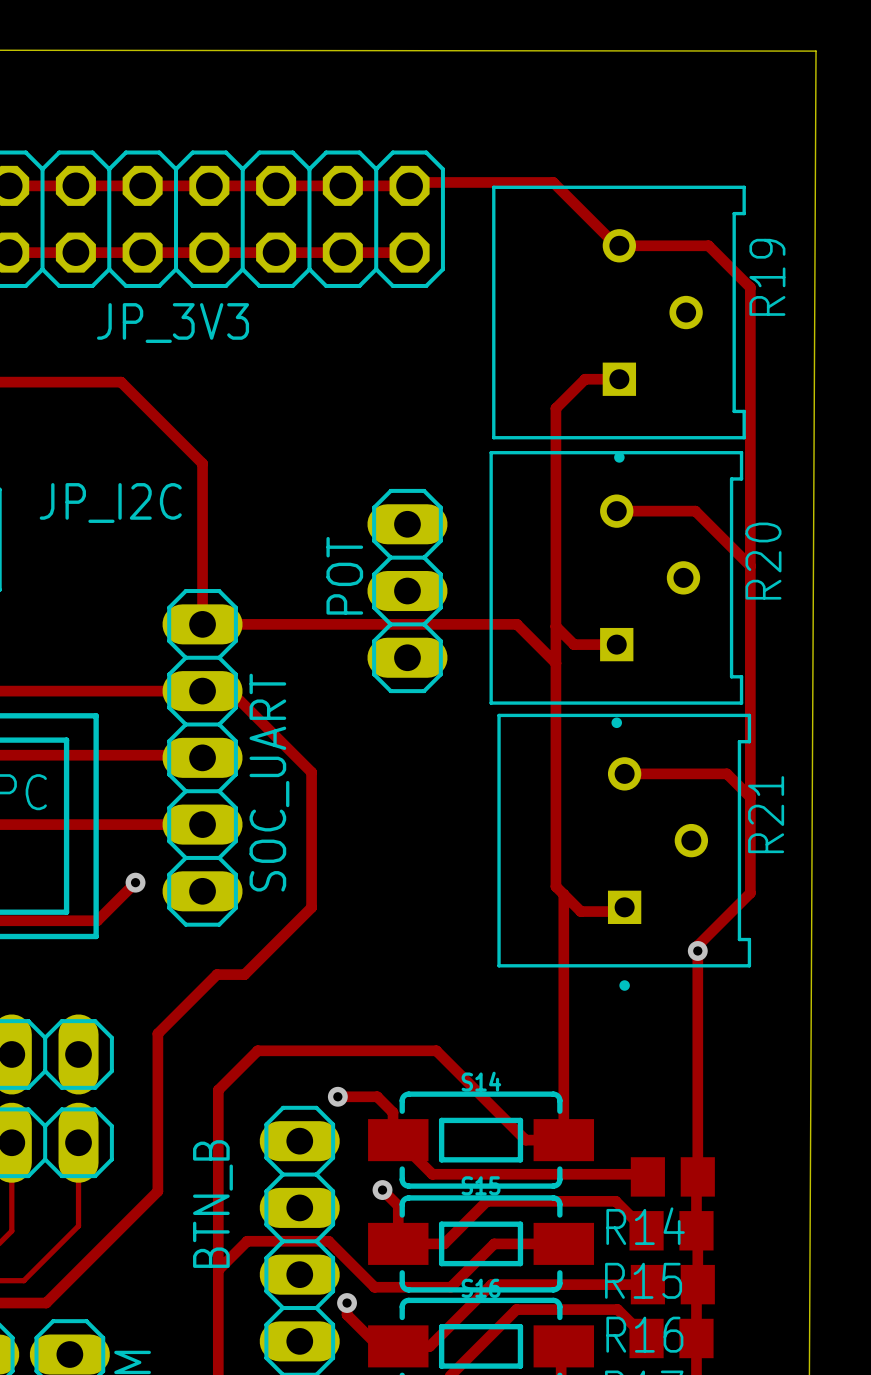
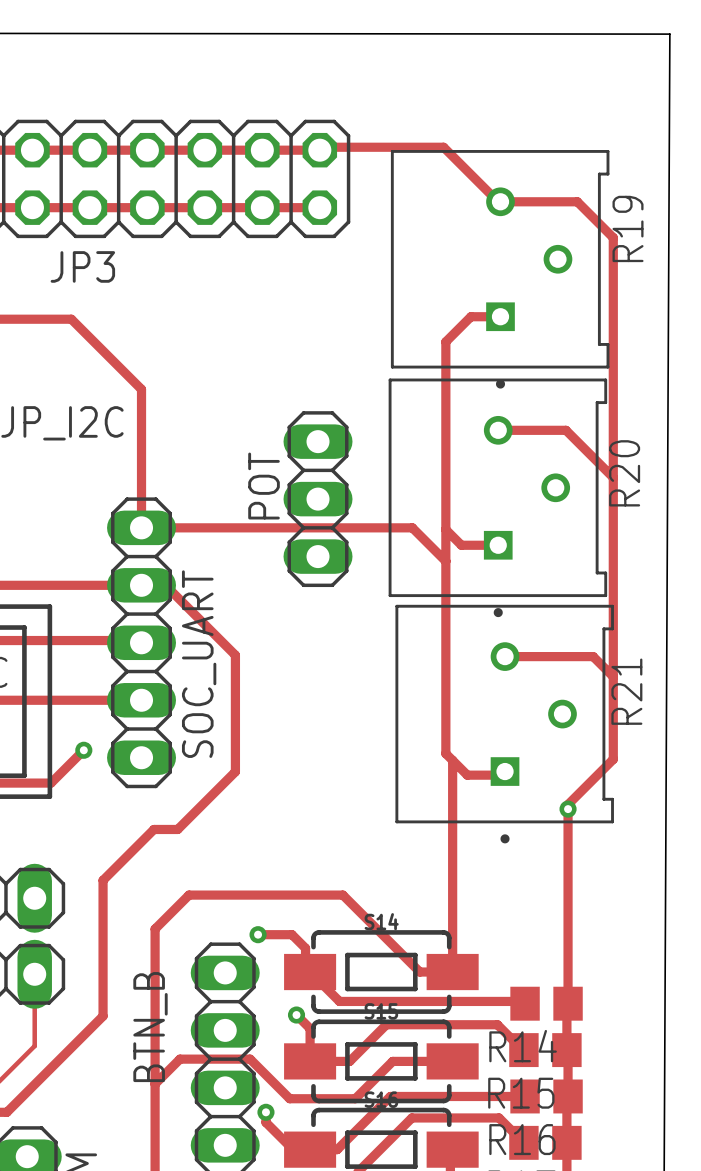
JP_3V3 name: JP_3V3 (173, 323) -> JP3 (82, 266)

